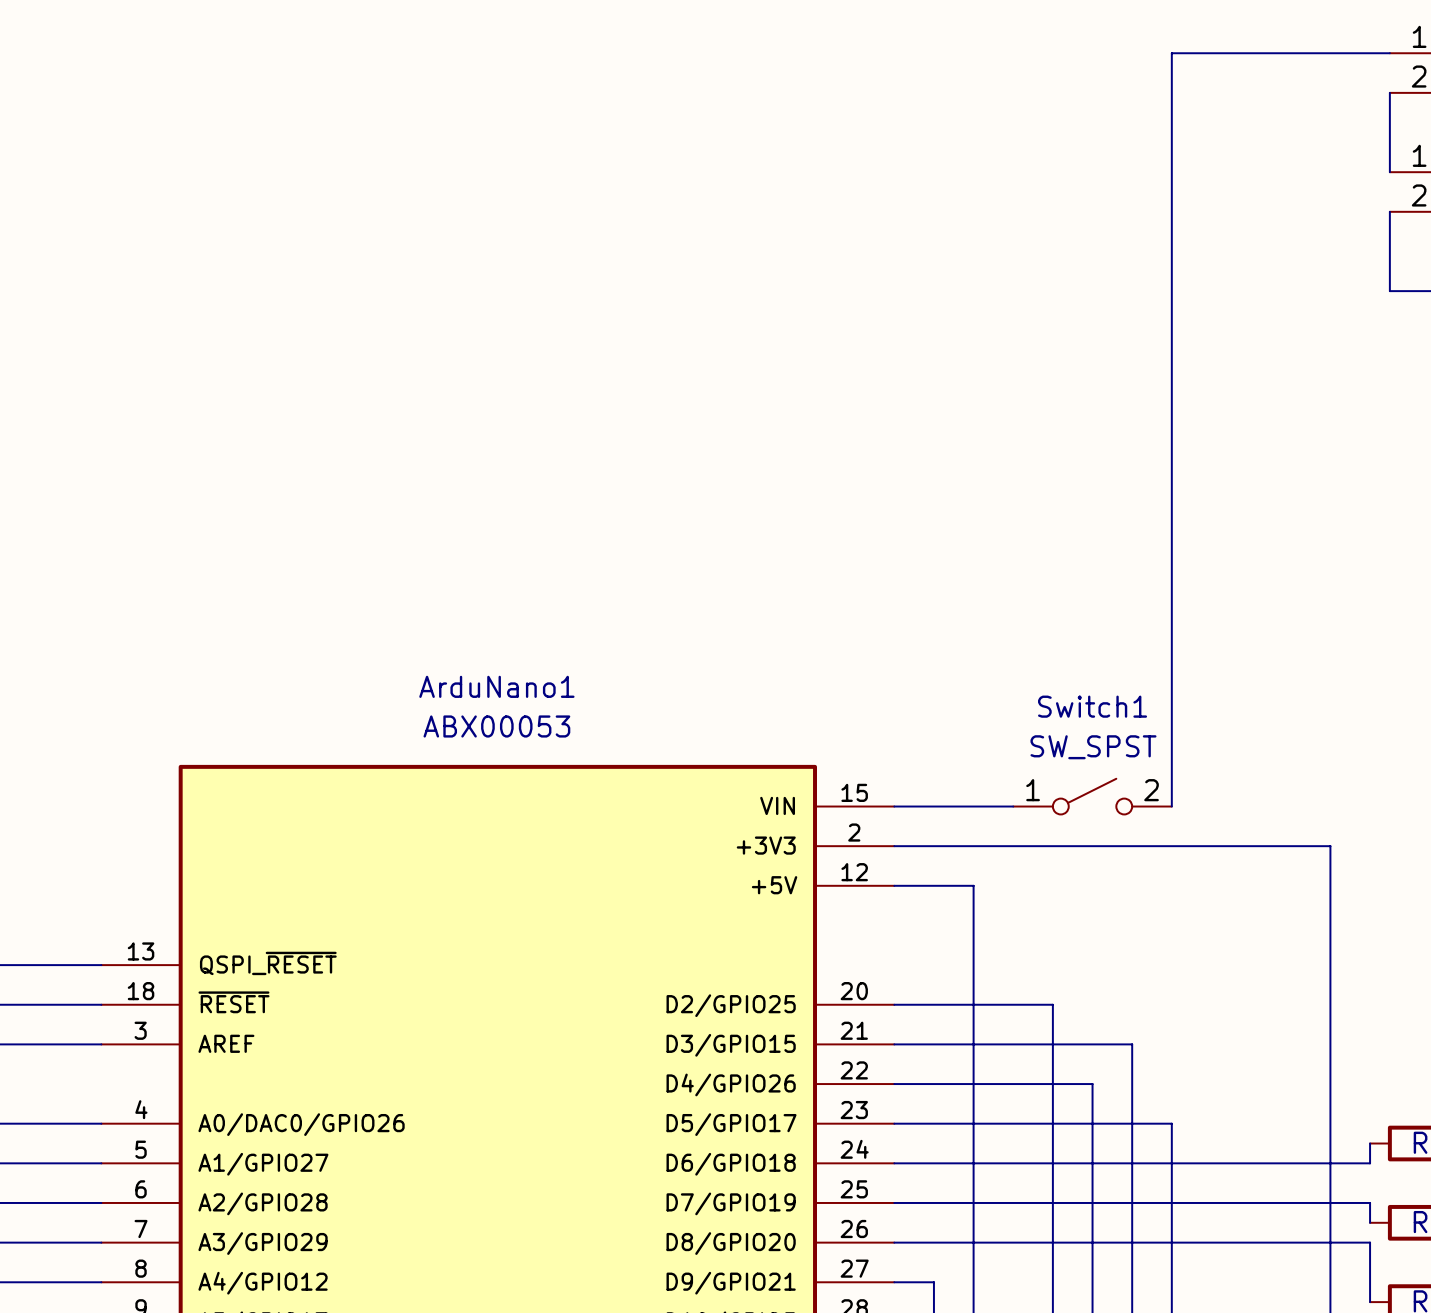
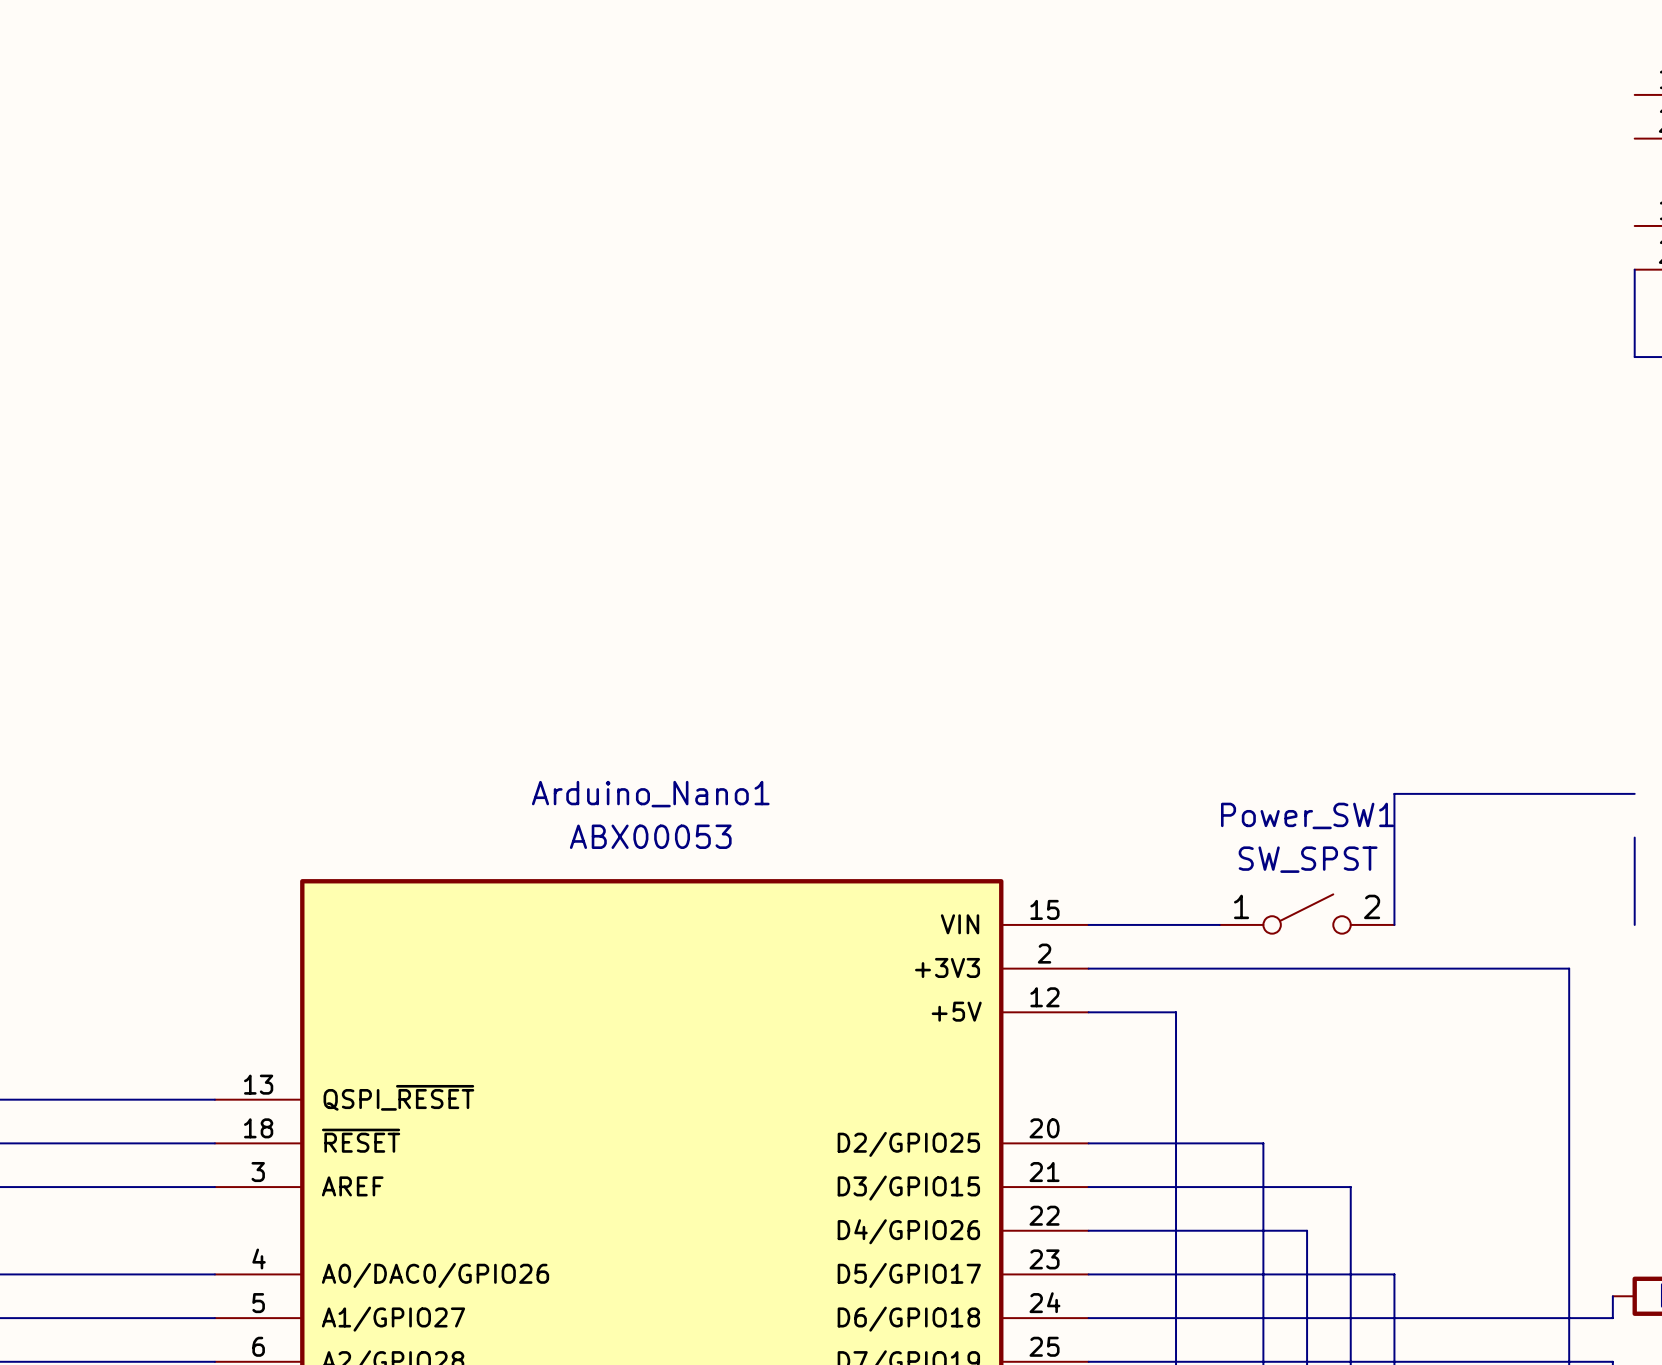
wire: (1389, 53) (1171, 53) (1171, 687) -> (1634, 793) (1394, 793)
wire: (1389, 92) (1389, 172) -> none
ArduNano1 name: ArduNano1 (496, 686) -> Arduino_Nano1 (650, 794)
Switch1 name: Switch1 (1092, 706) -> Power_SW1 (1307, 815)
wire: none -> (1634, 837) (1634, 924)

